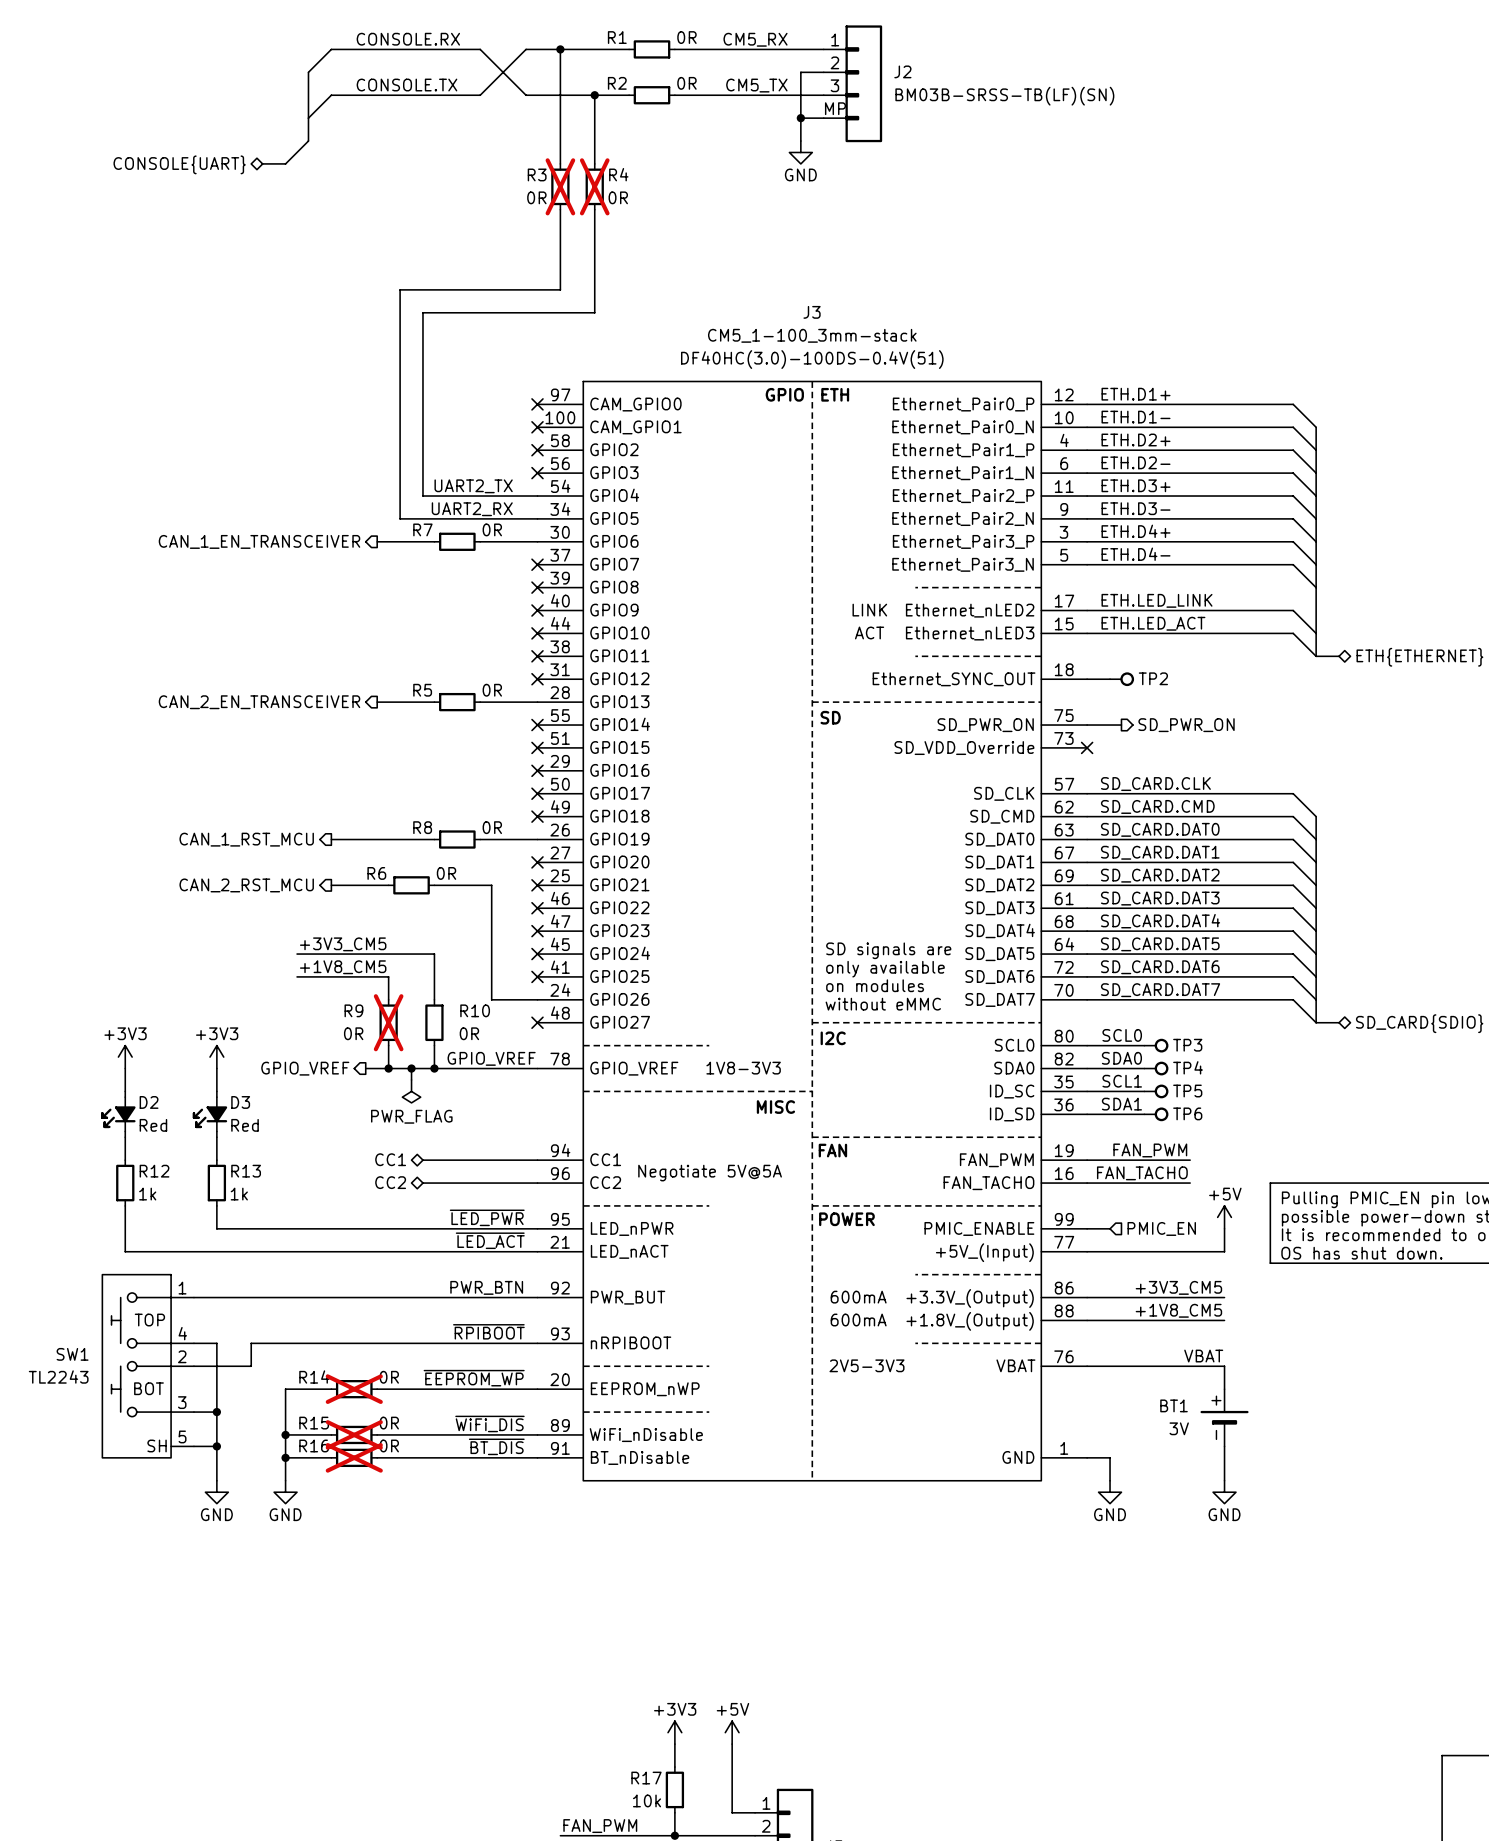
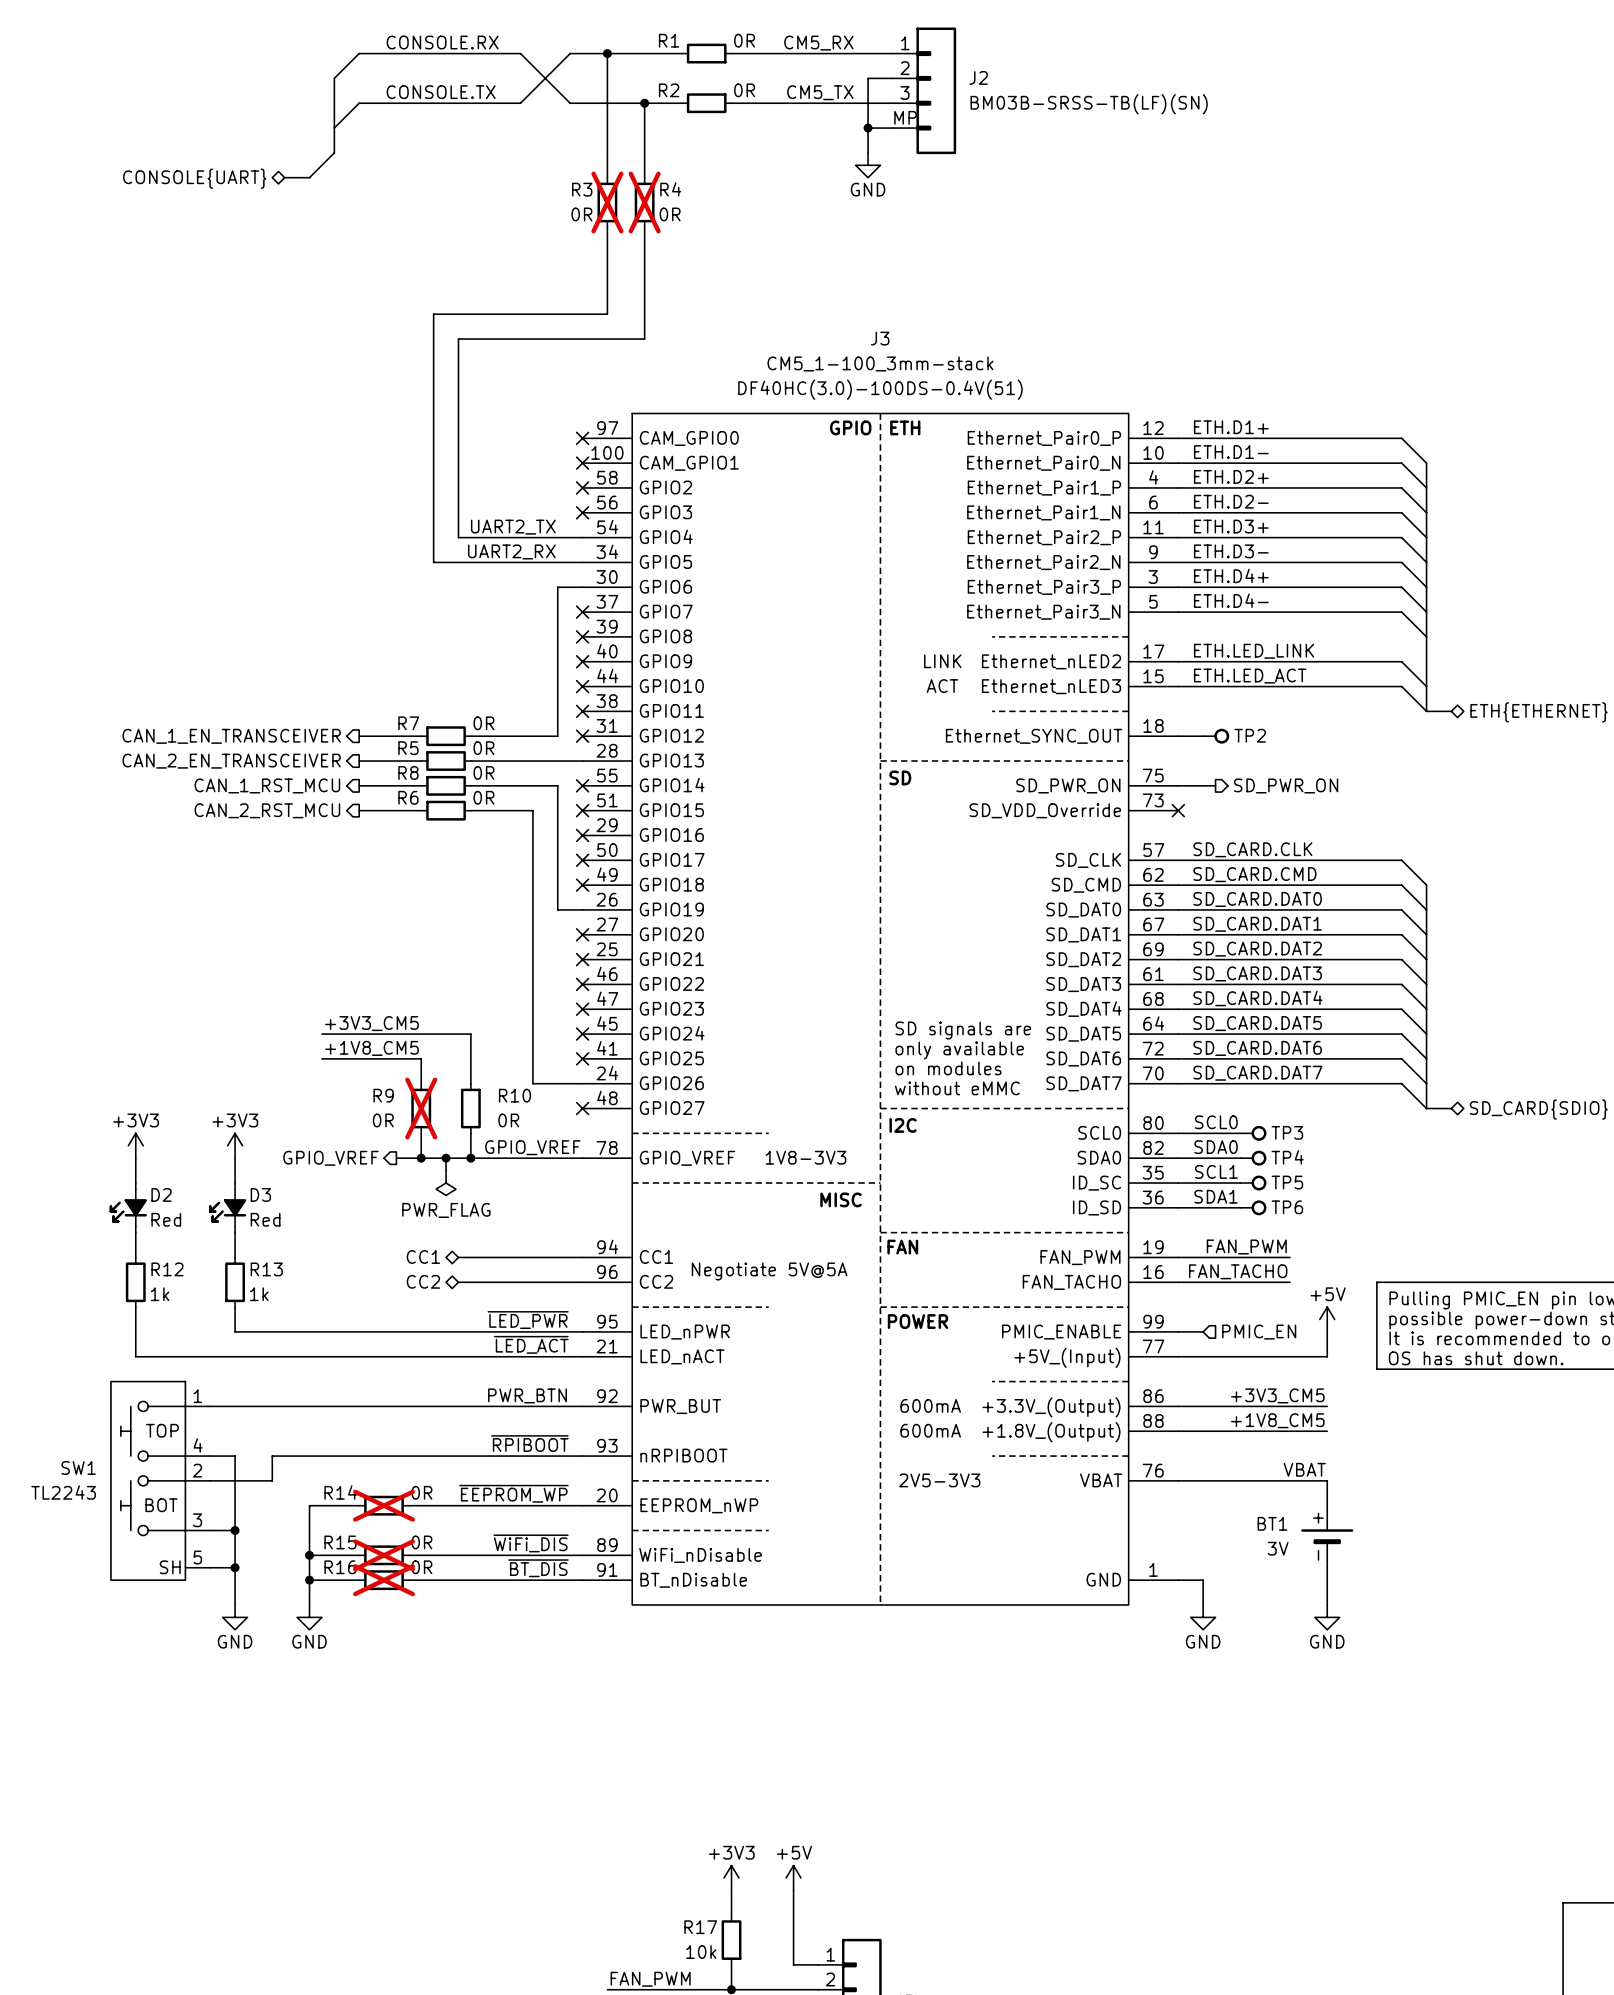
hierarchical label position: CAN_1_EN_TRANSCEIVER (259, 541) -> CAN_1_EN_TRANSCEIVER (231, 736)
wire: (377, 541) (434, 541) -> (359, 736) (421, 736)
R7 position: (457, 541) -> (446, 736)
wire: (480, 541) (514, 541) -> (470, 736) (557, 736) (557, 587)
hierarchical label position: CAN_2_EN_TRANSCEIVER (259, 702) -> CAN_2_EN_TRANSCEIVER (231, 761)
wire: none -> (359, 761) (408, 761)
wire: (388, 702) (434, 702) -> (520, 761) (470, 761)
R5 position: (457, 702) -> (446, 761)
wire: none -> (359, 785) (421, 785)
hierarchical label position: CAN_1_RST_MCU (246, 839) -> CAN_1_RST_MCU (267, 785)
wire: (331, 839) (434, 839) -> none
R8 position: (457, 839) -> (446, 785)
wire: (480, 839) (514, 839) -> (470, 785) (557, 785) (557, 909)
hierarchical label position: CAN_2_RST_MCU (246, 885) -> CAN_2_RST_MCU (267, 810)
wire: (331, 885) (388, 885) -> (359, 810) (421, 810)
R6 position: (411, 885) -> (446, 810)
wire: (434, 885) (491, 885) -> (470, 810) (532, 810) (532, 959)

